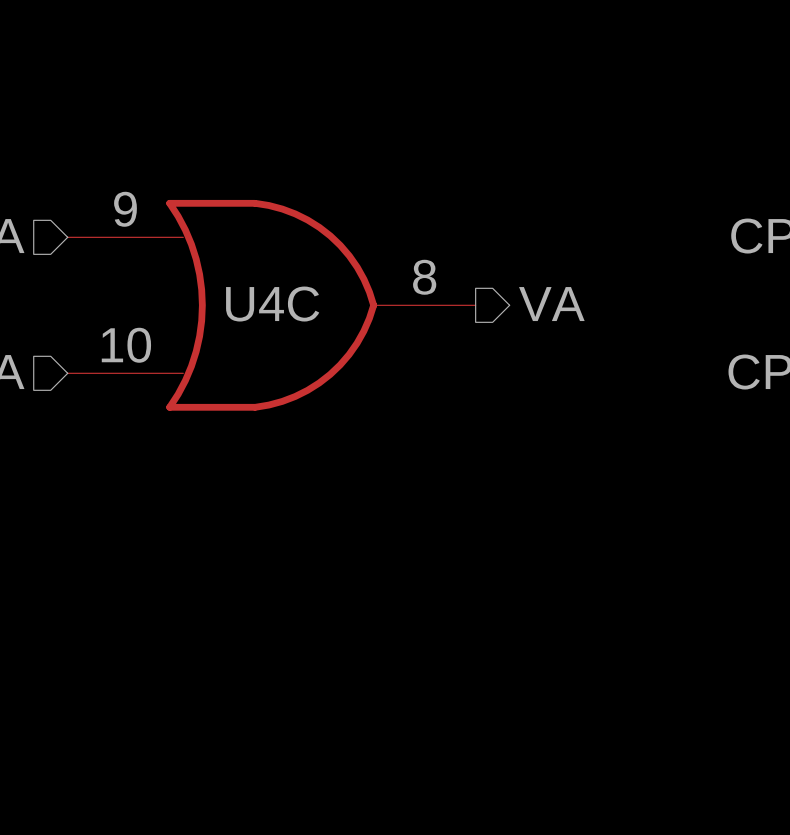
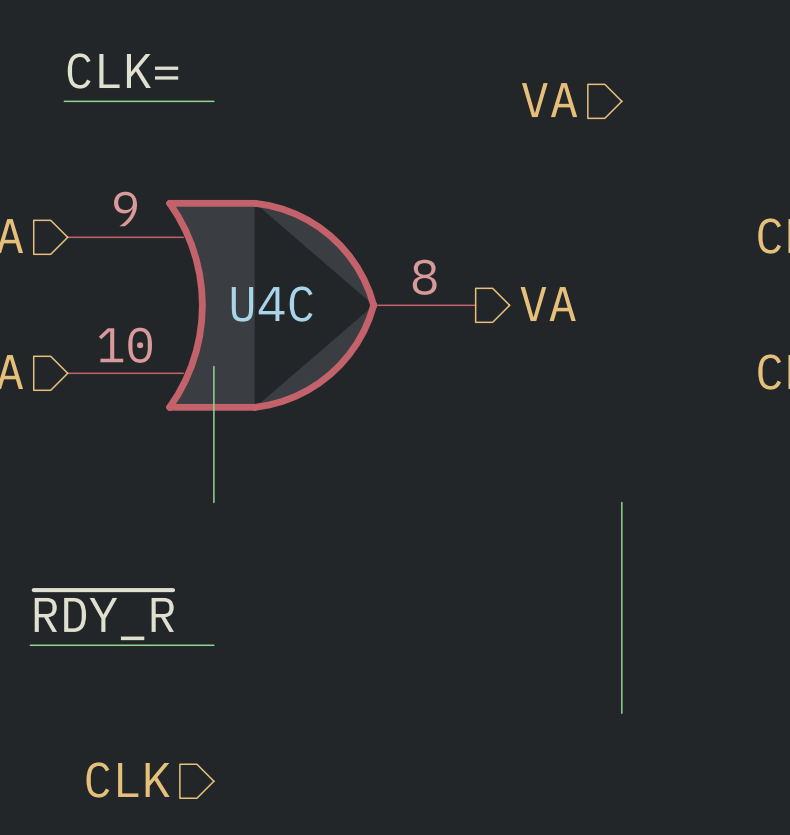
label: none -> CLK= (122, 71)
hierarchical label: none -> VA (549, 100)
wire: none -> (64, 101) (213, 101)
wire: none -> (213, 366) (213, 502)
wire: none -> (621, 502) (621, 713)
label: none -> ~{RDY_R} (103, 615)
wire: none -> (30, 645) (213, 645)
hierarchical label: none -> CLK (128, 779)

